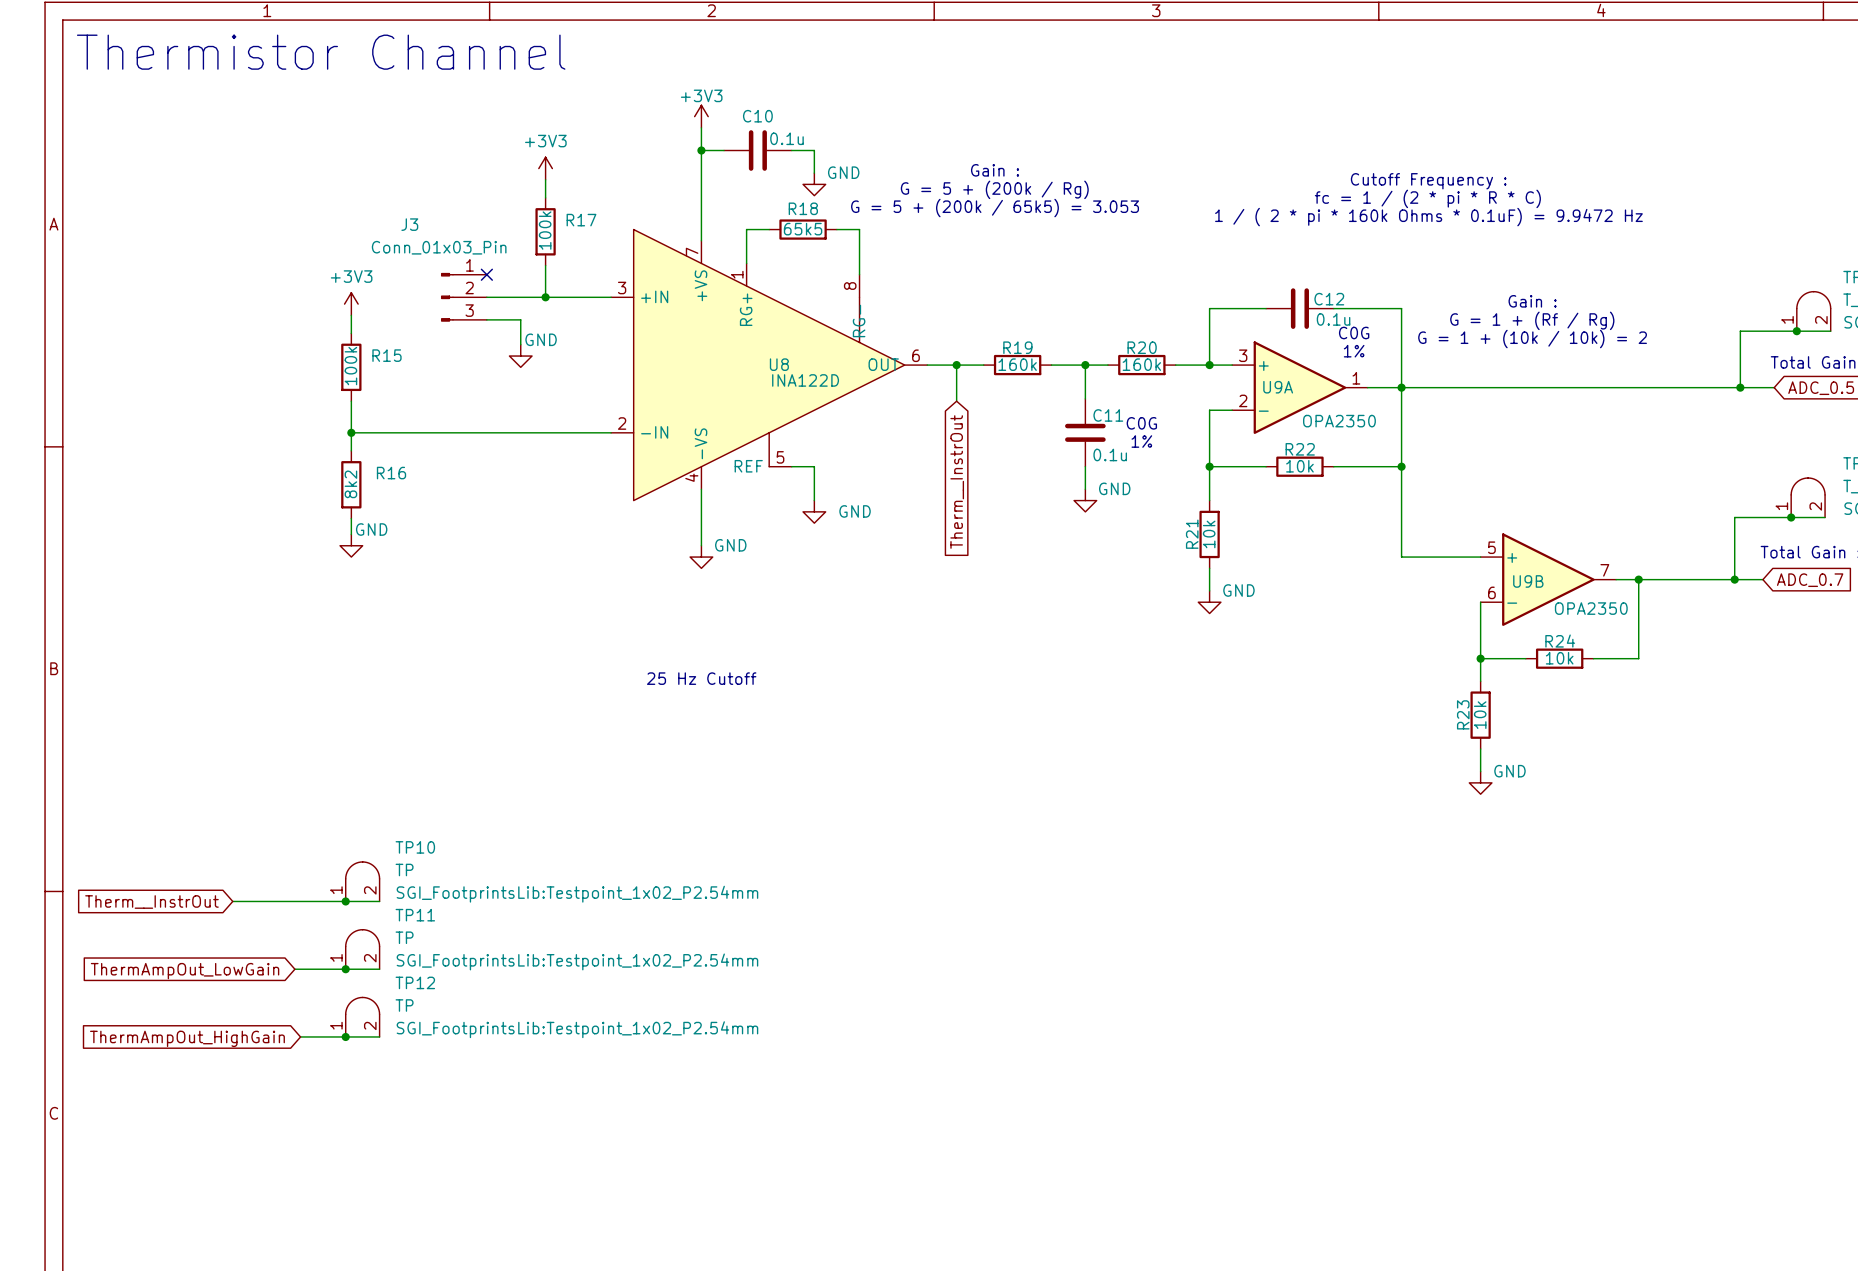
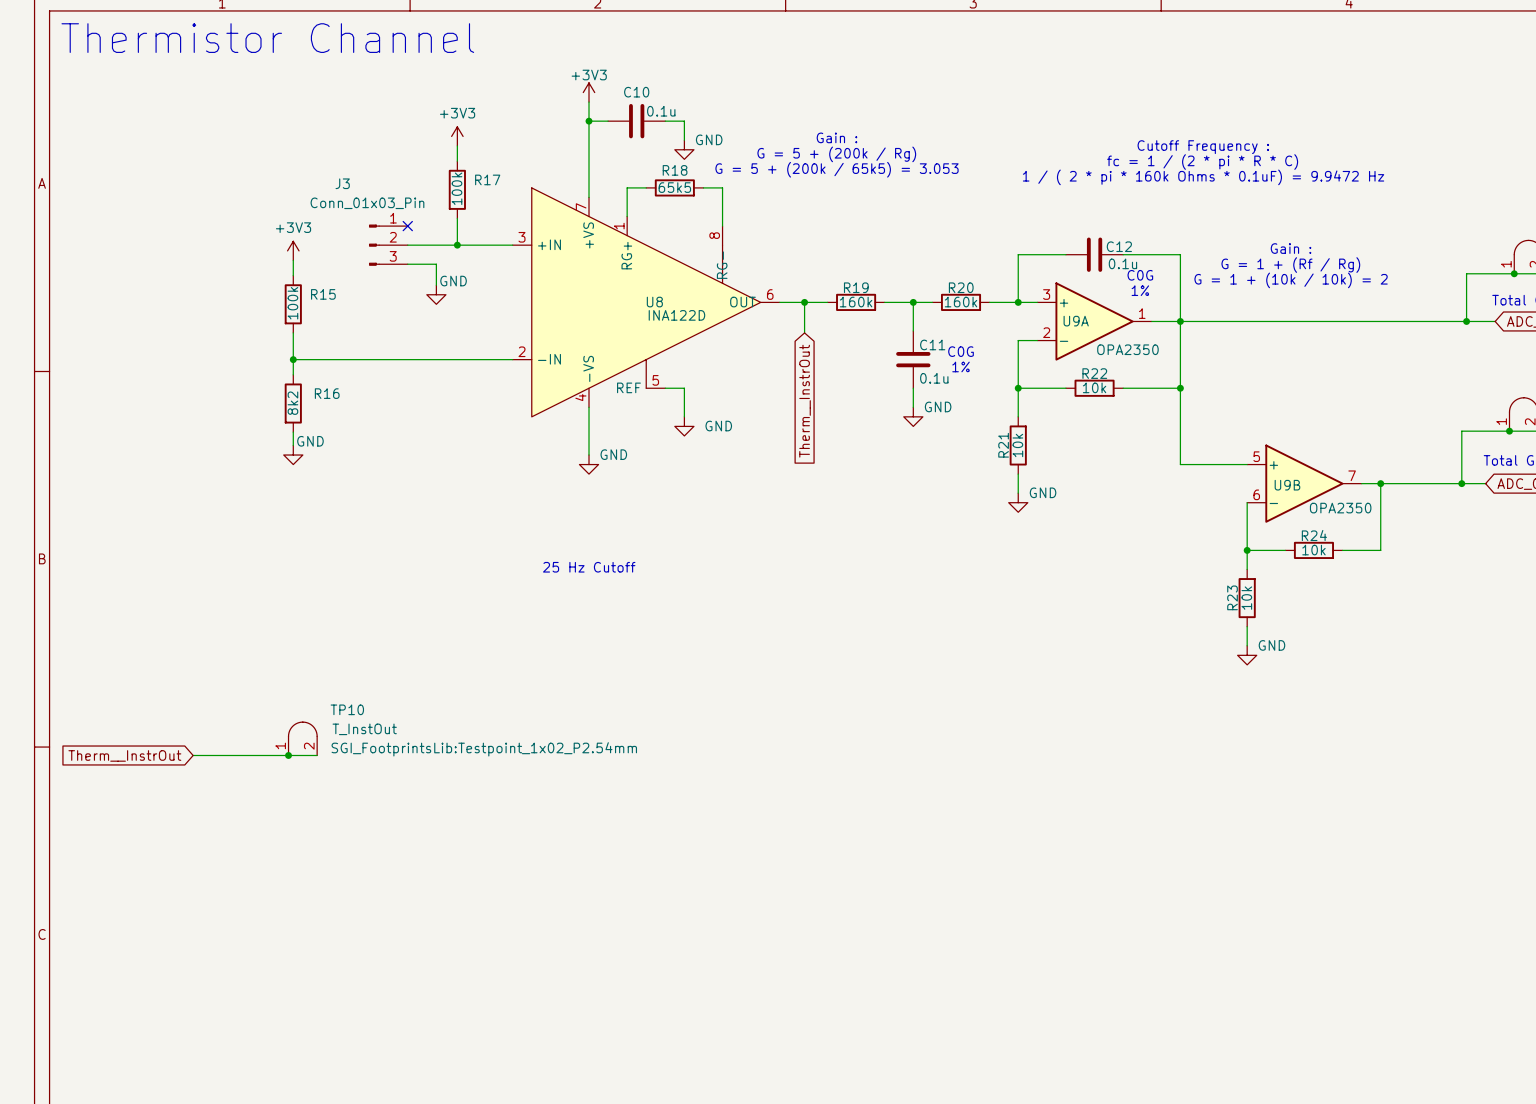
TP10 value: TP (404, 869) -> T_InstOut (364, 729)
TP11: TP (362, 949) -> none
wire: (294, 969) (379, 969) -> none
junction: (345, 969) -> none
global label: ThermAmpOut_LowGain (185, 971) -> none
TP12: TP (362, 1017) -> none
wire: (300, 1036) (379, 1036) -> none
junction: (345, 1036) -> none
global label: ThermAmpOut_HighGain (187, 1038) -> none

